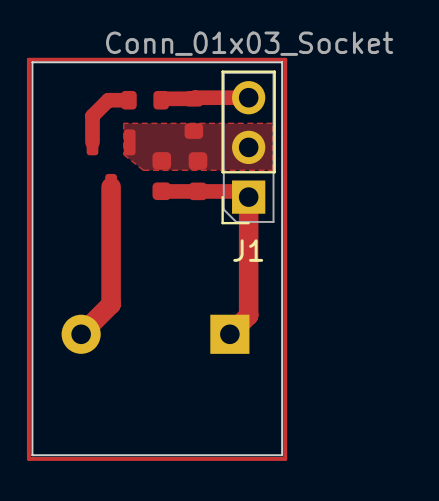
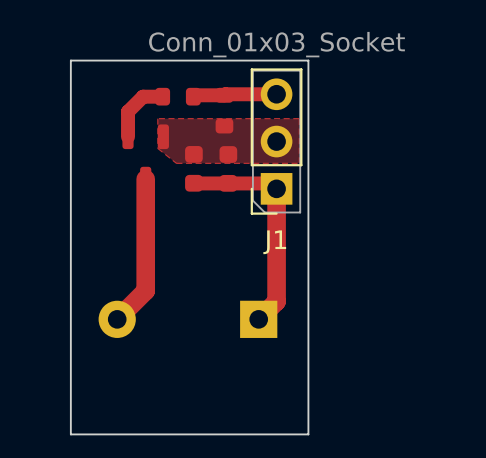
top track: (285, 59) (28, 59) (28, 458) (285, 458) (285, 59) -> none

